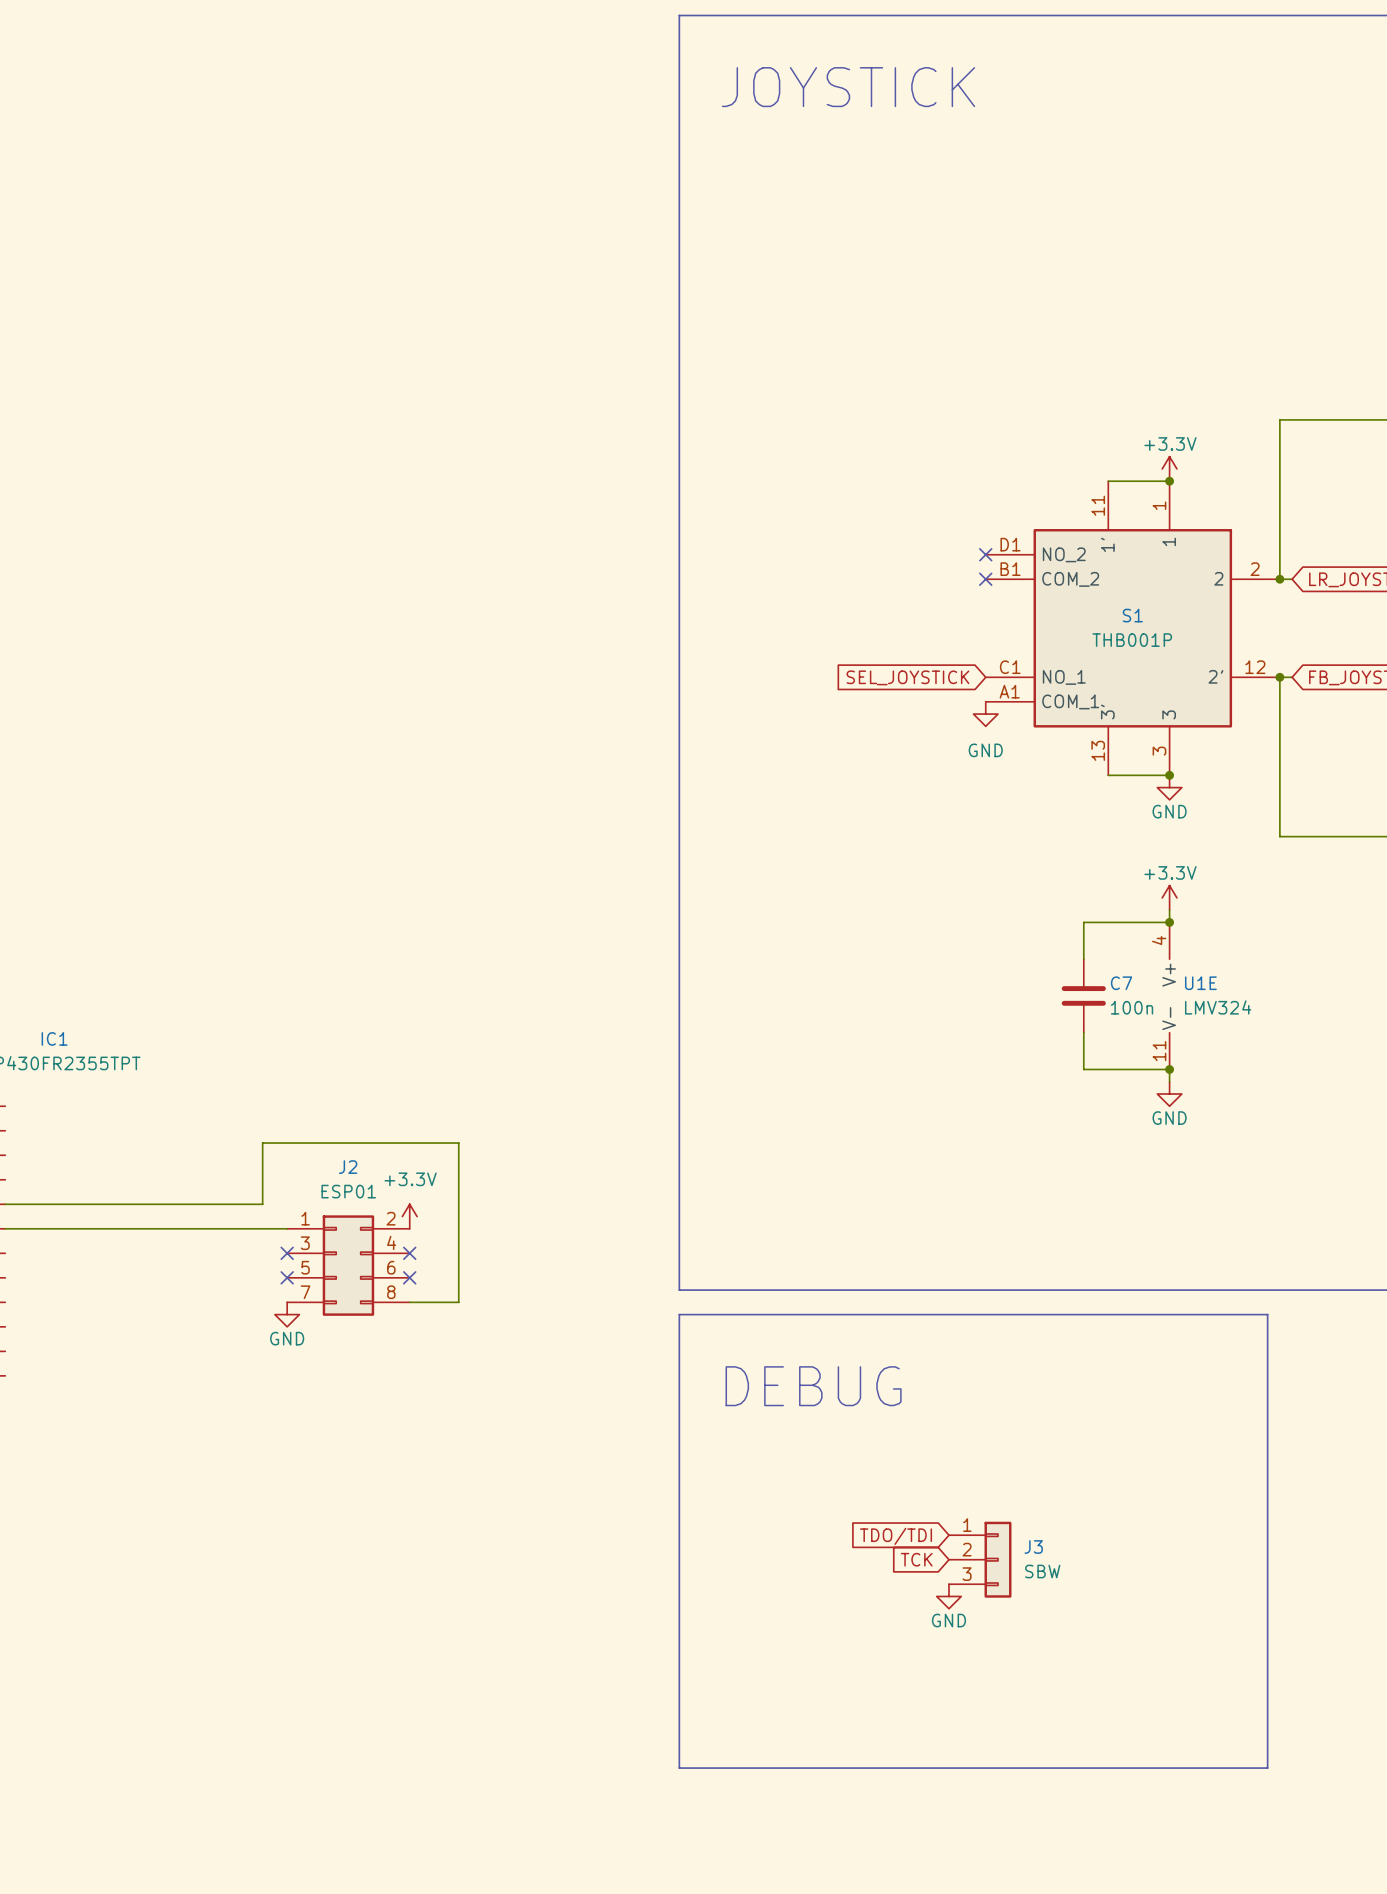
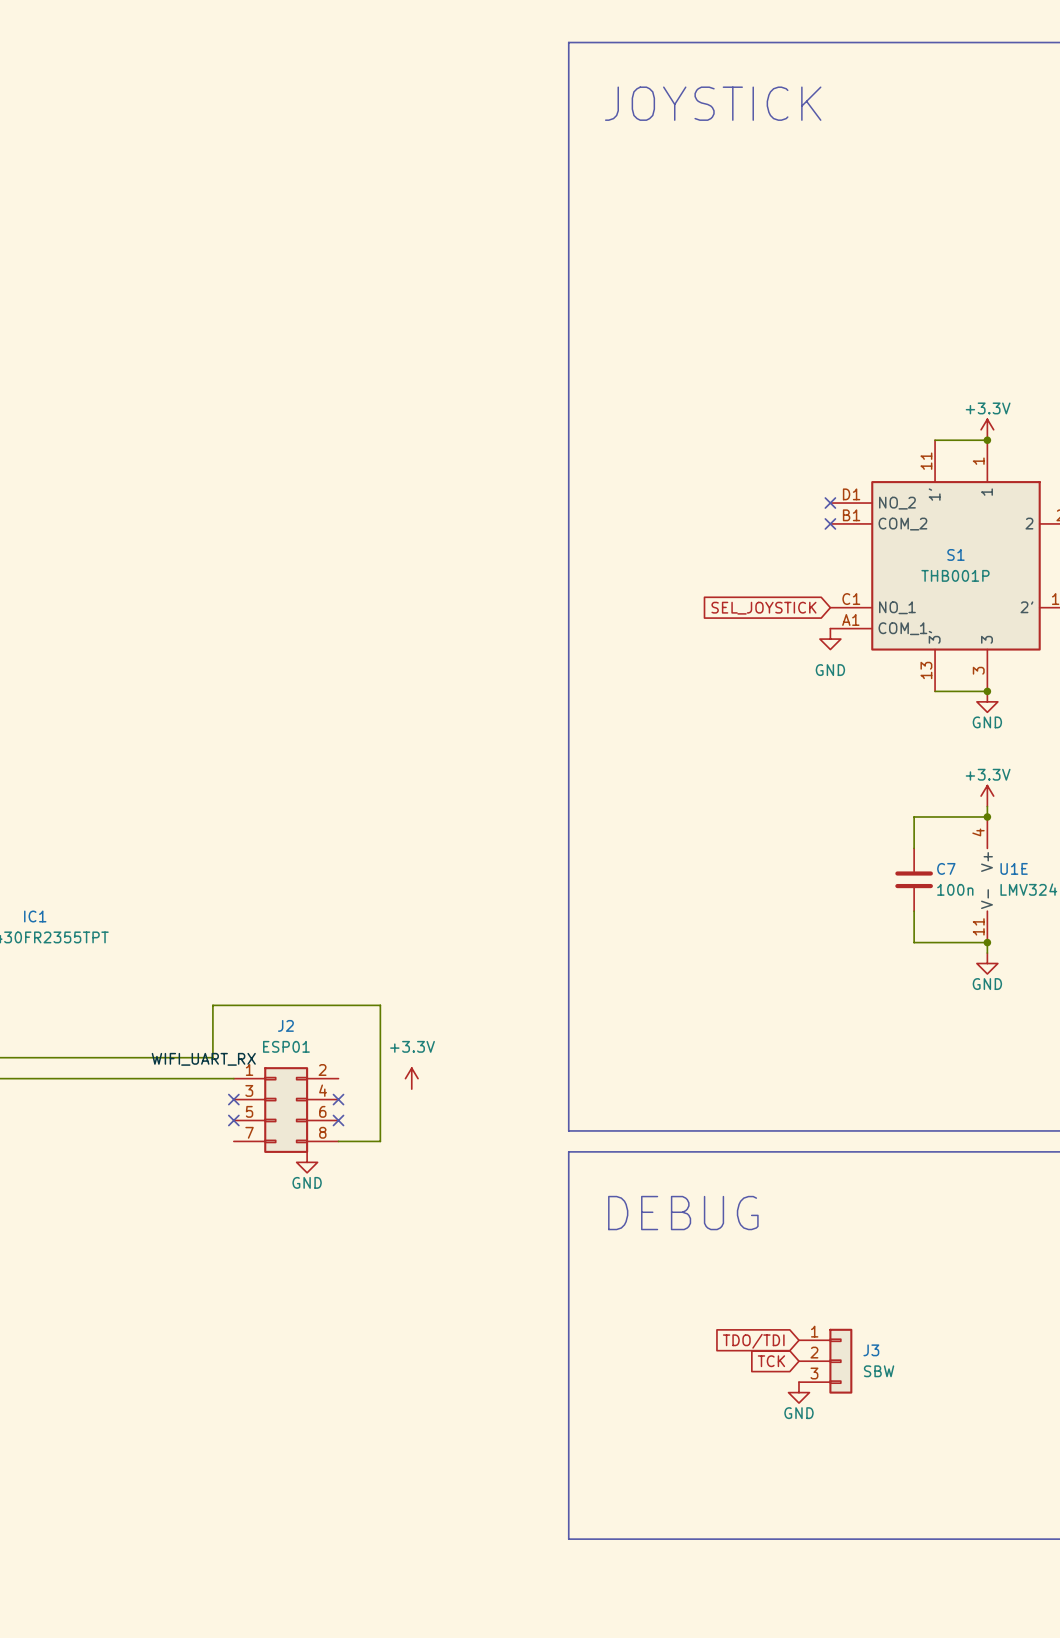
label: none -> WIFI_UART_RX (203, 1059)
power symbol position: +3.3V (409, 1216) -> +3.3V (411, 1078)
power symbol position: GND (287, 1314) -> GND (307, 1162)

